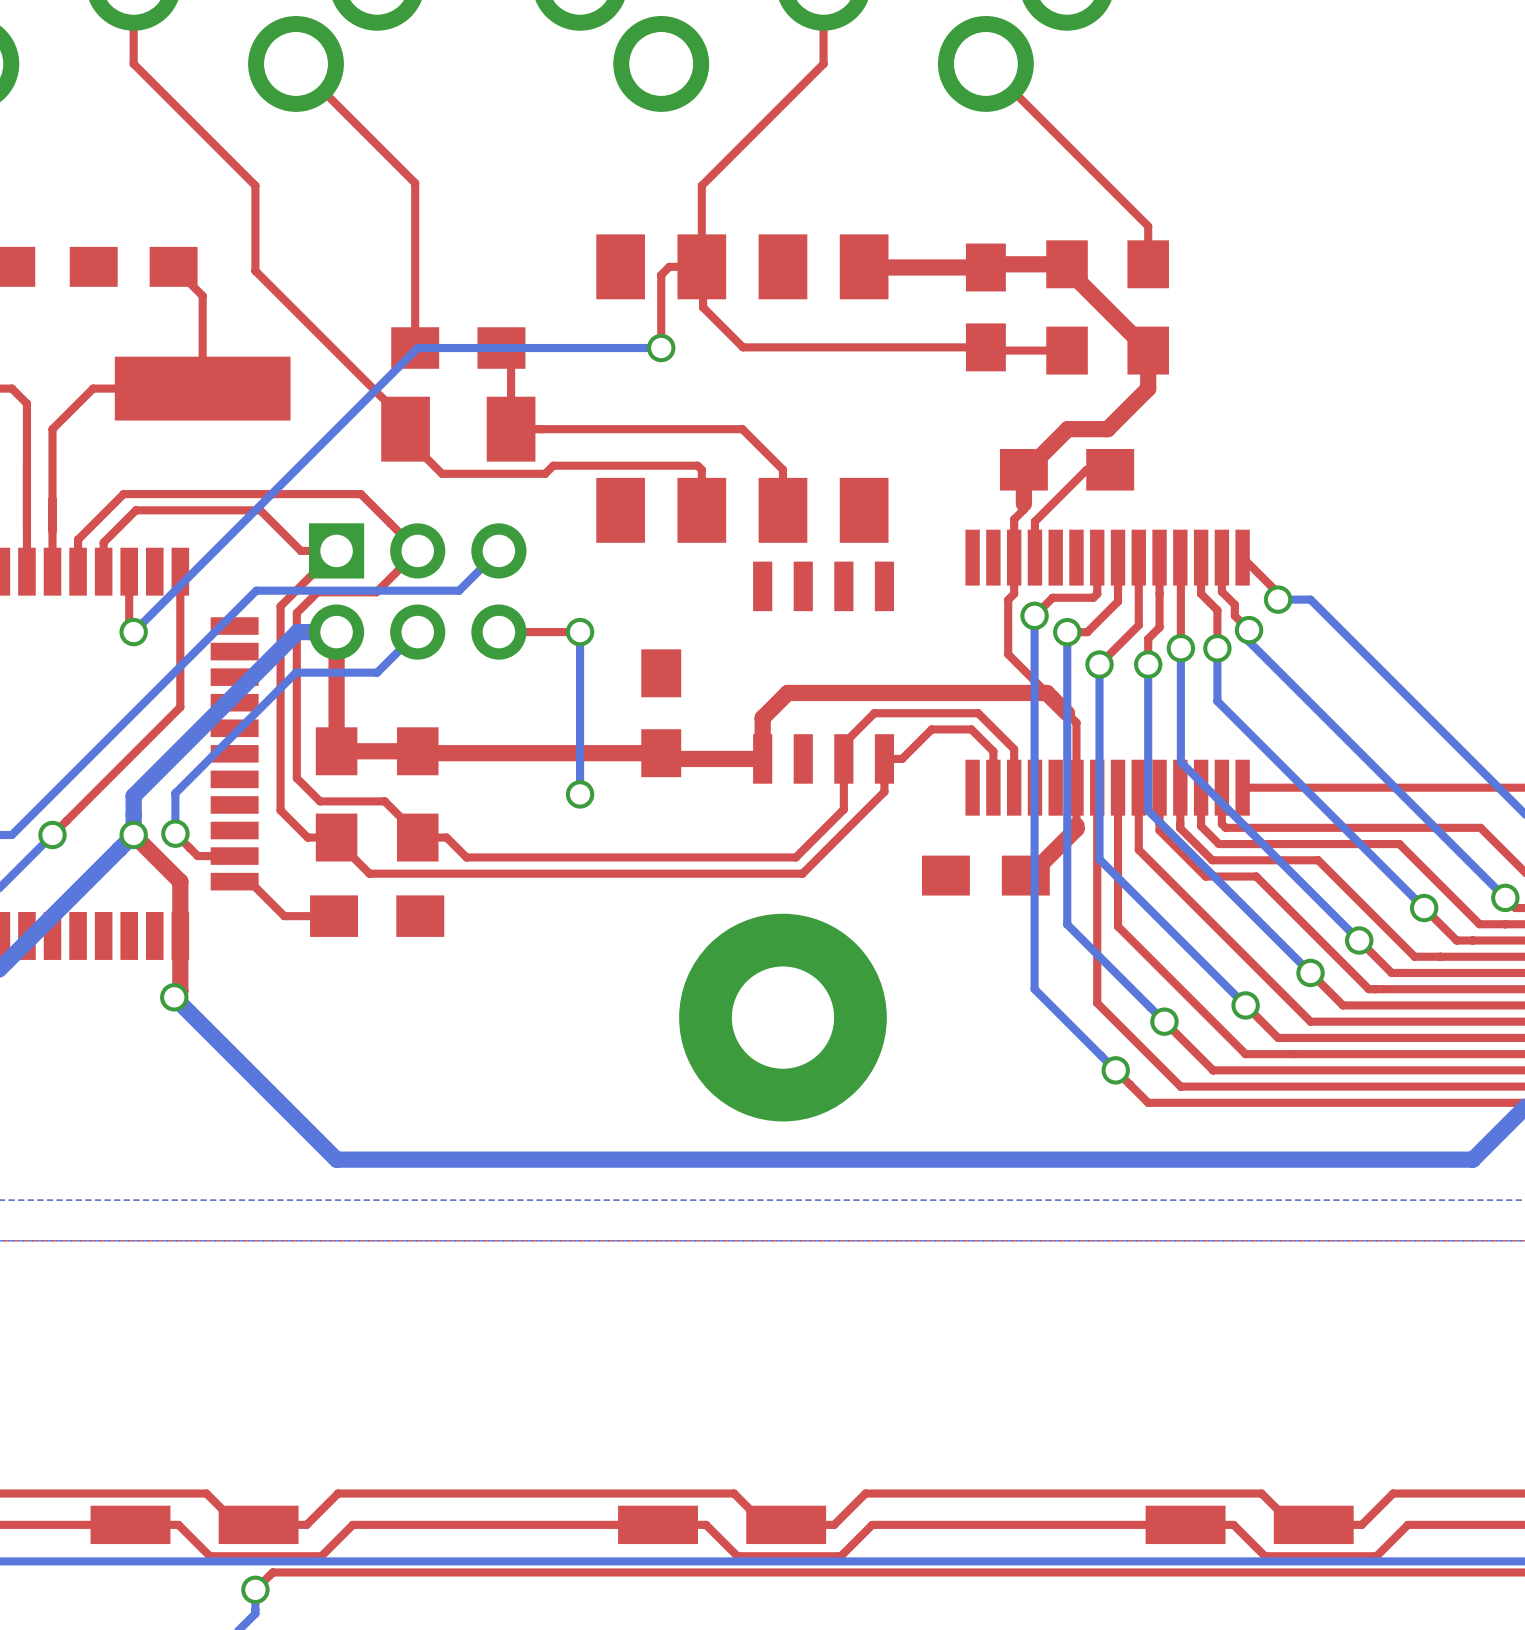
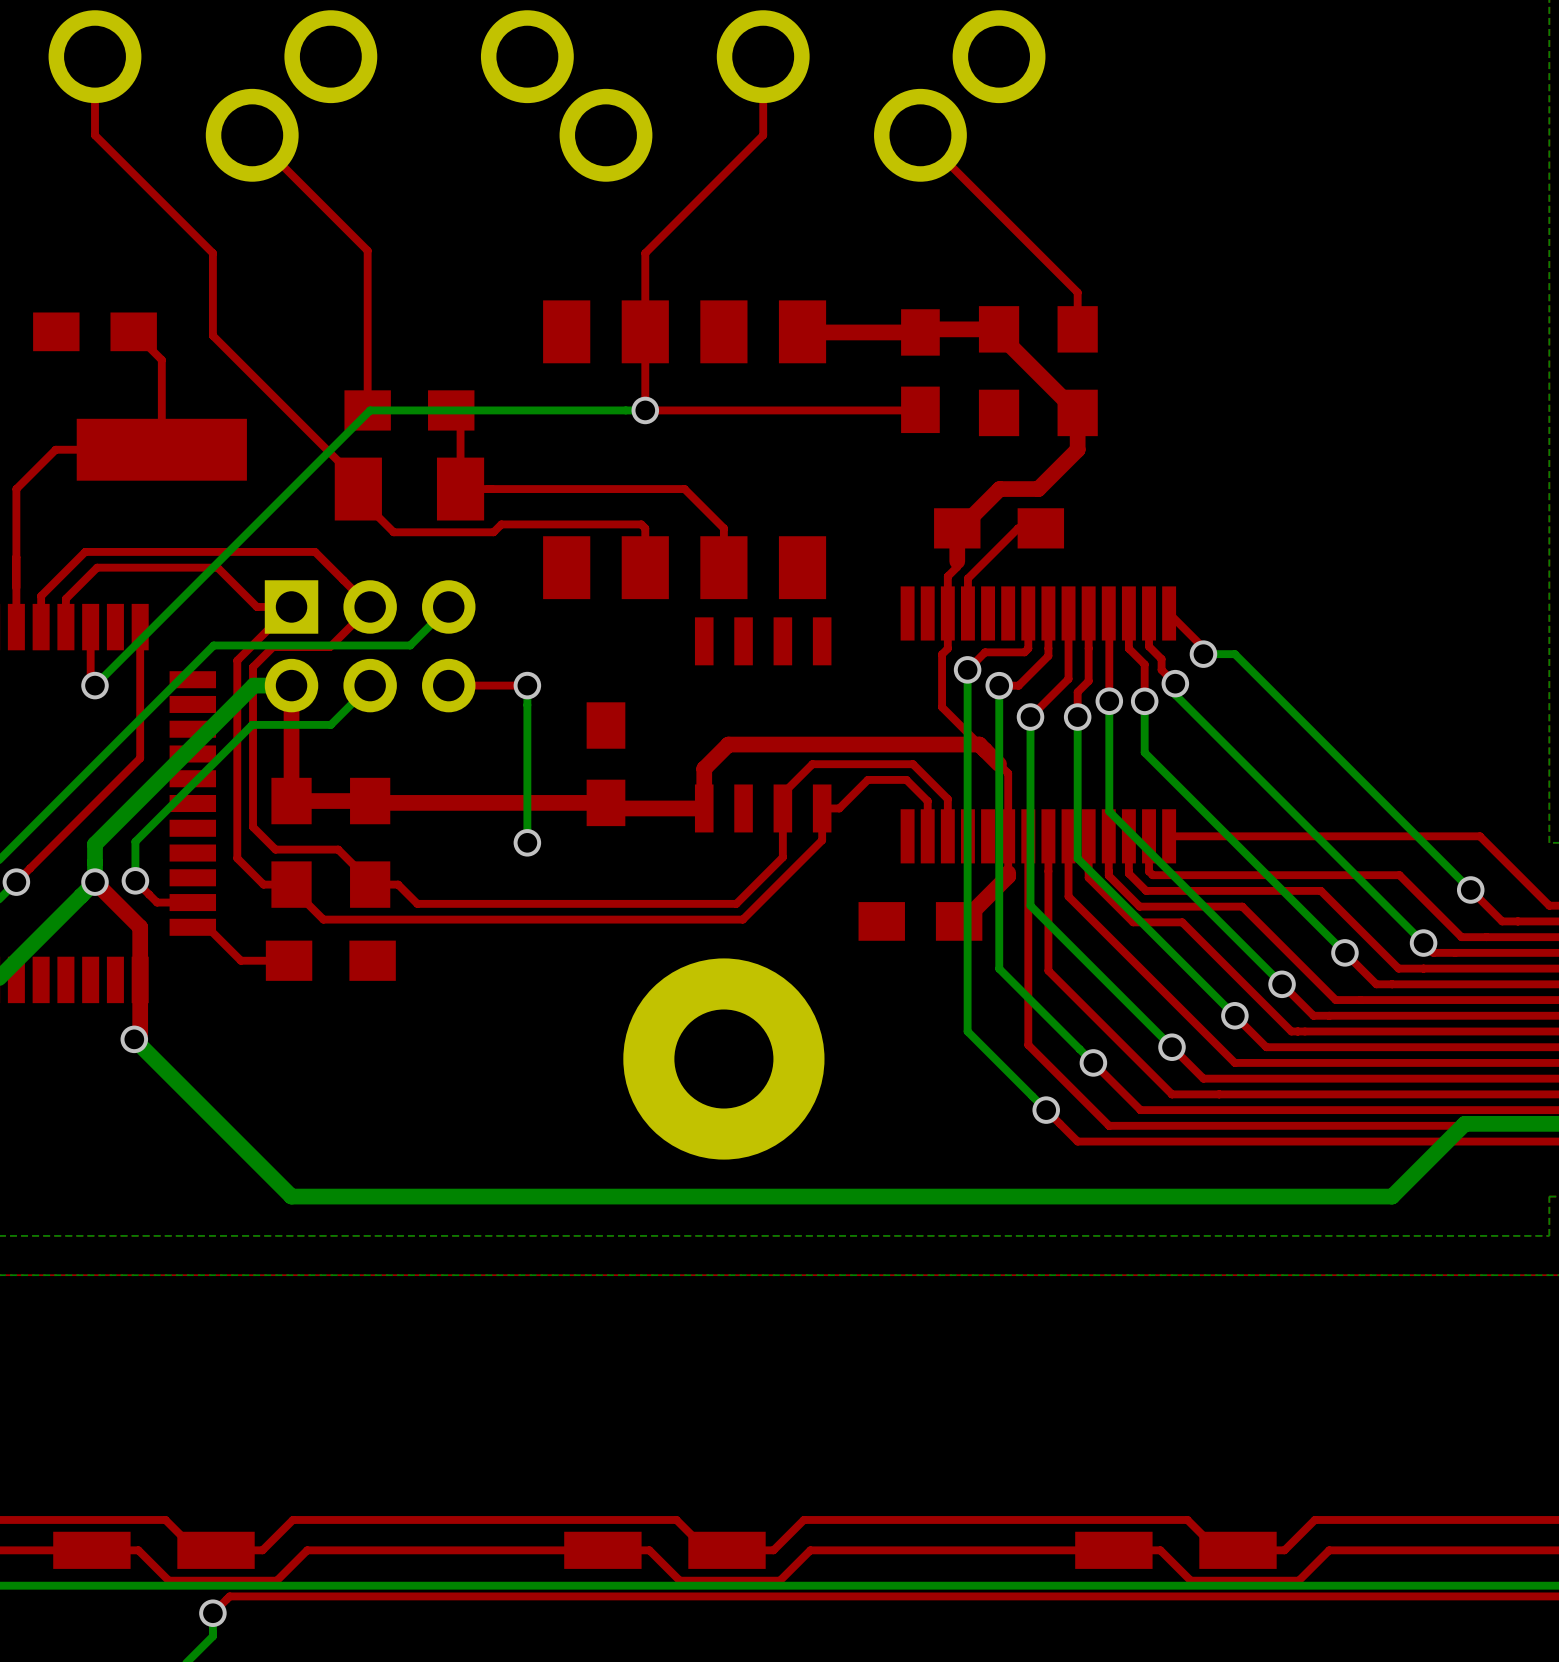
top track: (701, 266) (669, 266) (661, 274) (661, 348) -> (645, 331) (645, 410) (917, 410) (920, 412)
top track: (703, 268) (703, 307) (743, 347) (985, 347) (989, 350) (1067, 350) -> none
via position: (661, 348) -> (645, 410)
bottom track: none -> (645, 410) (605, 410)

